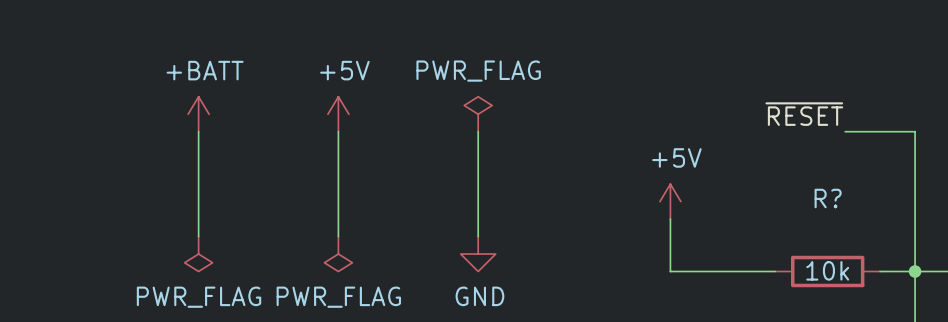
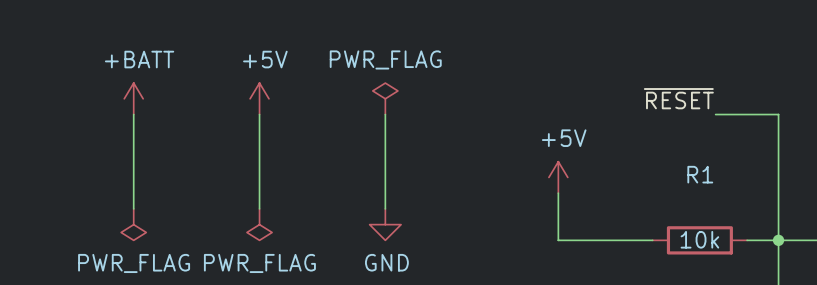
R? name: R? (828, 198) -> R1 (700, 174)

